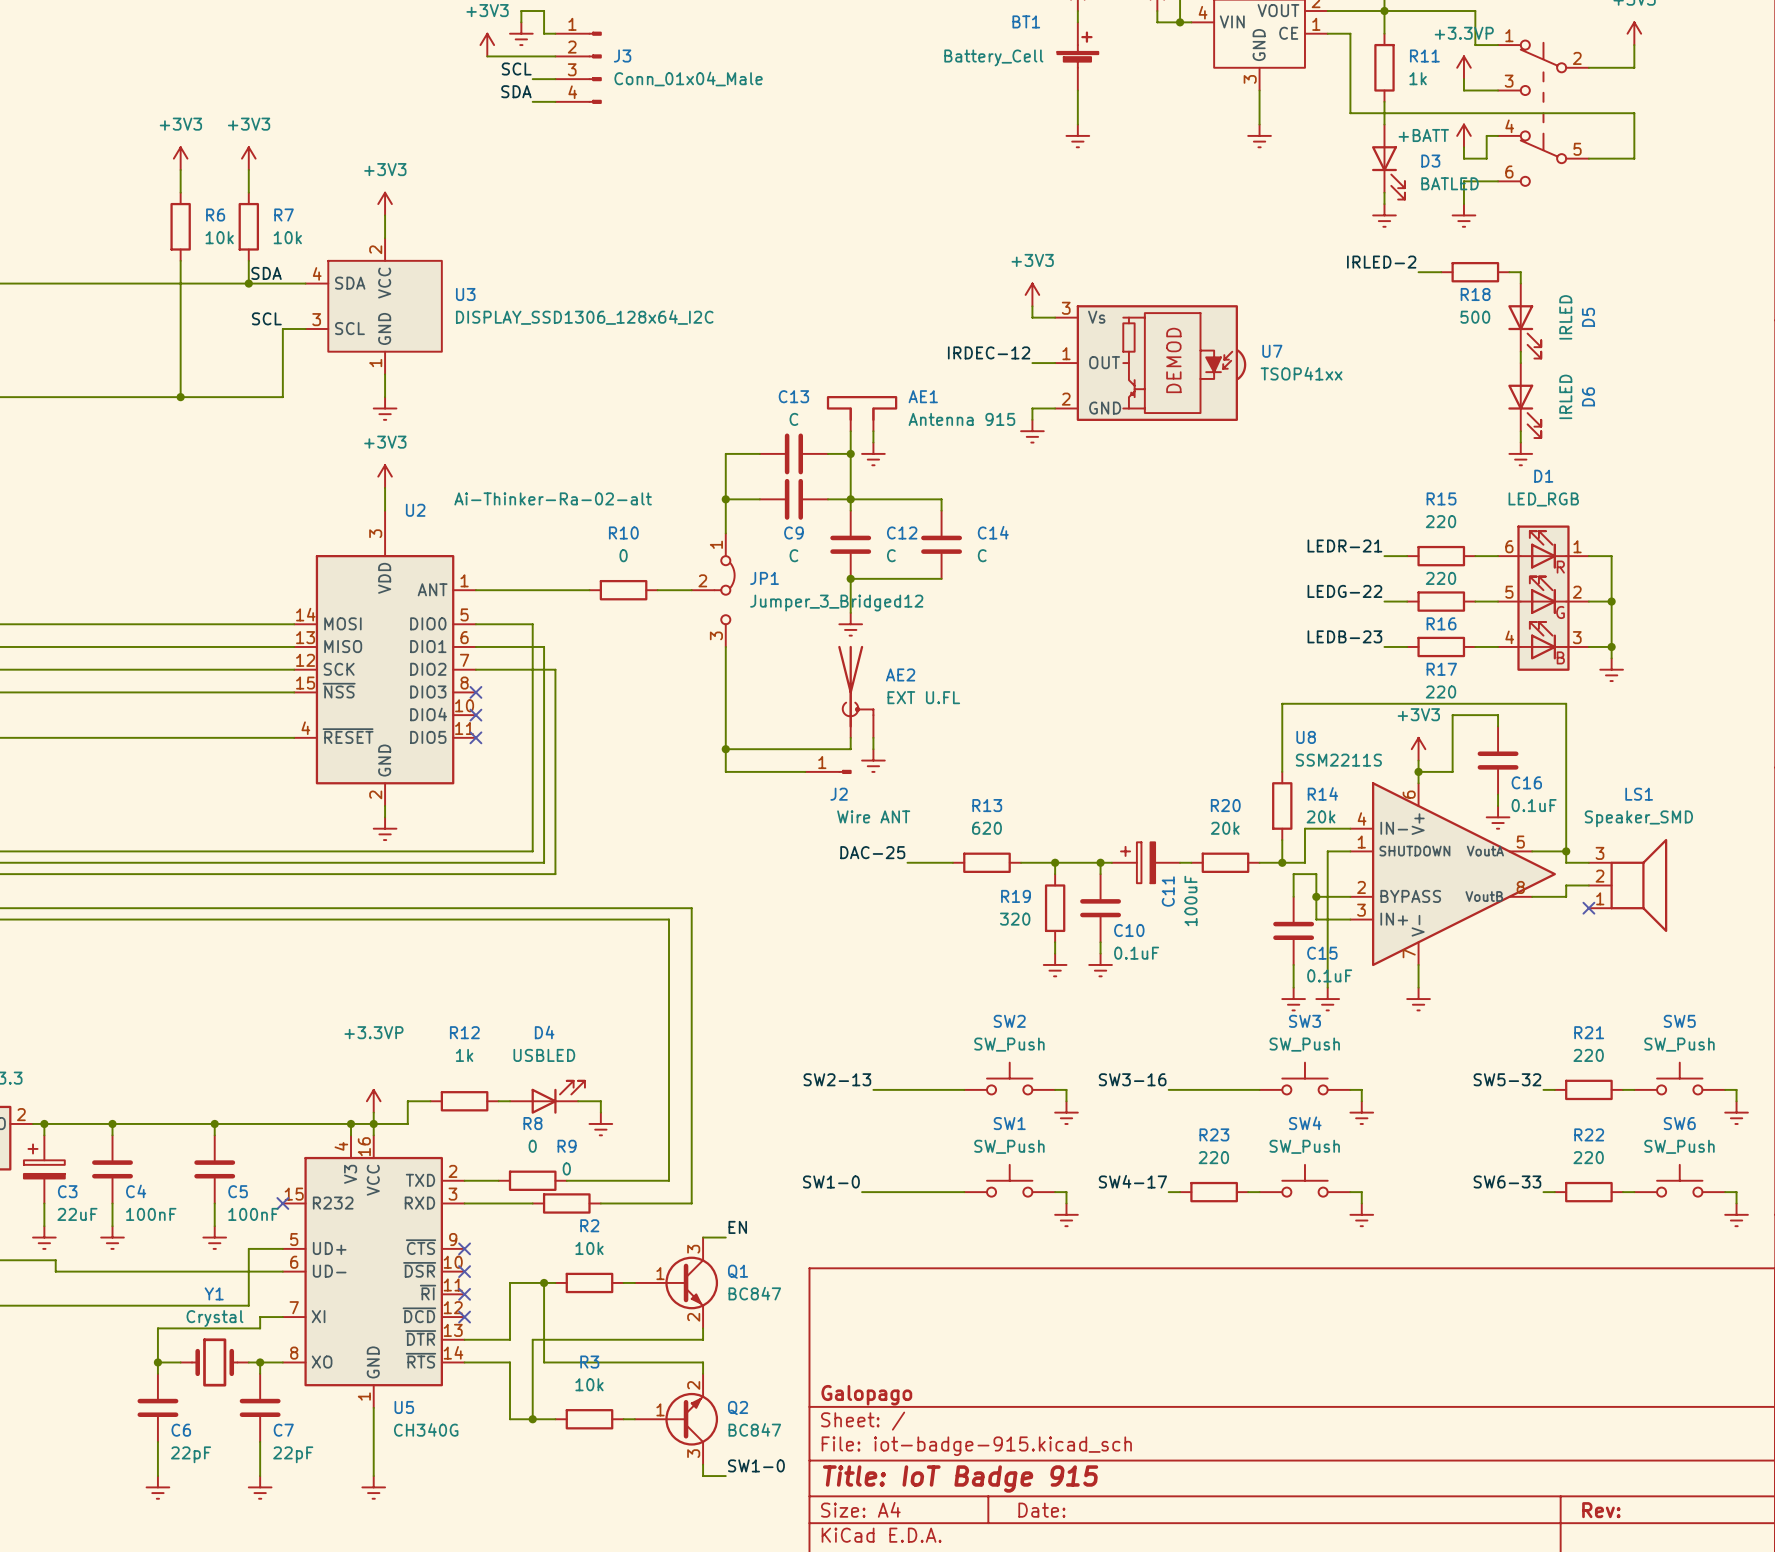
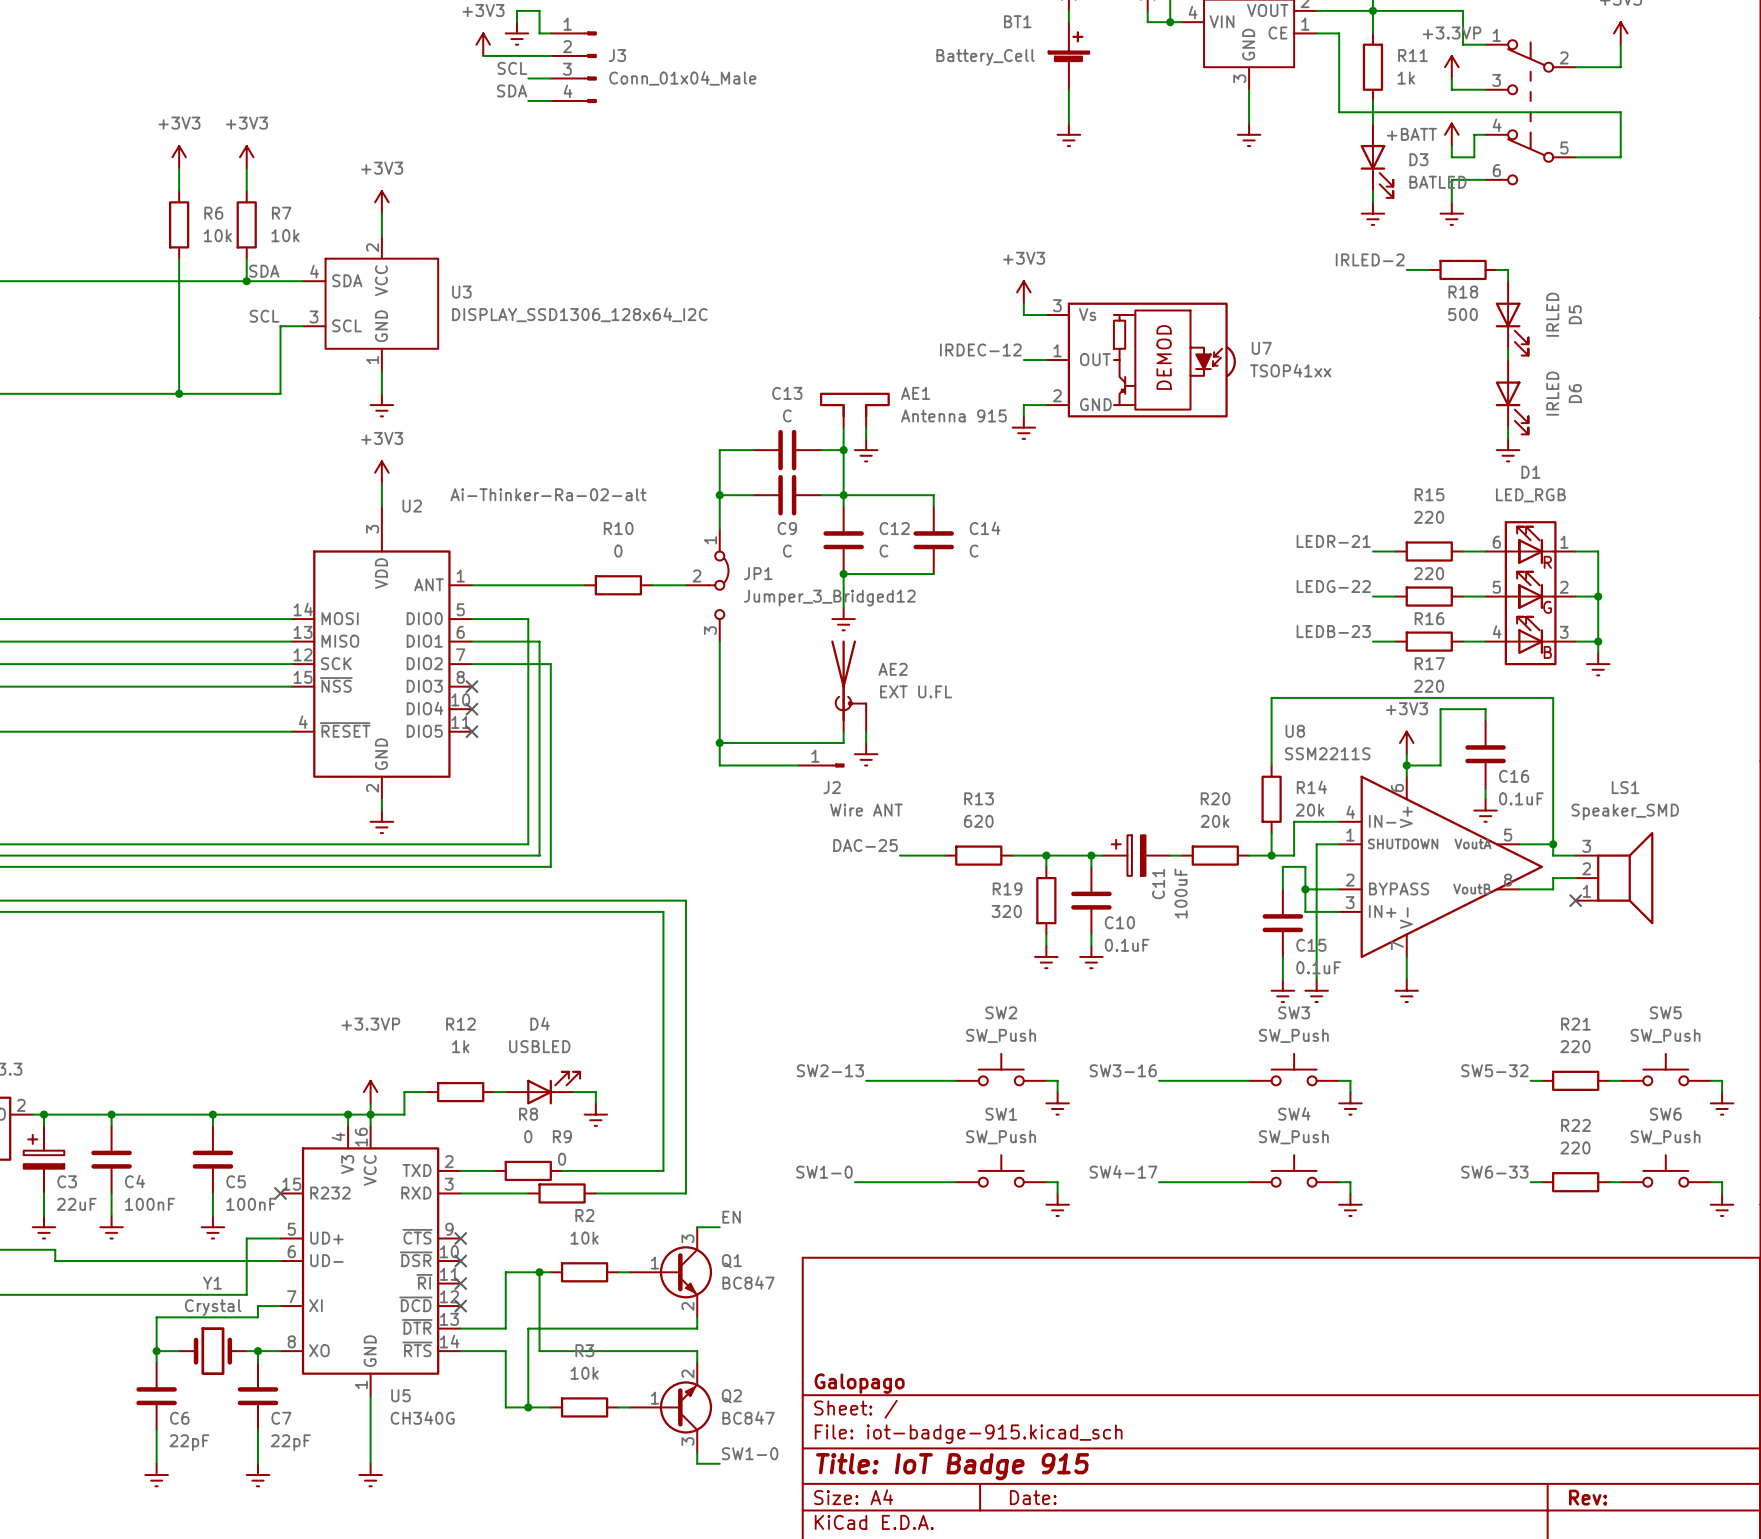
wire: none -> (1170, 1182) (1237, 1182)
R23: 220 (1214, 1192) -> none

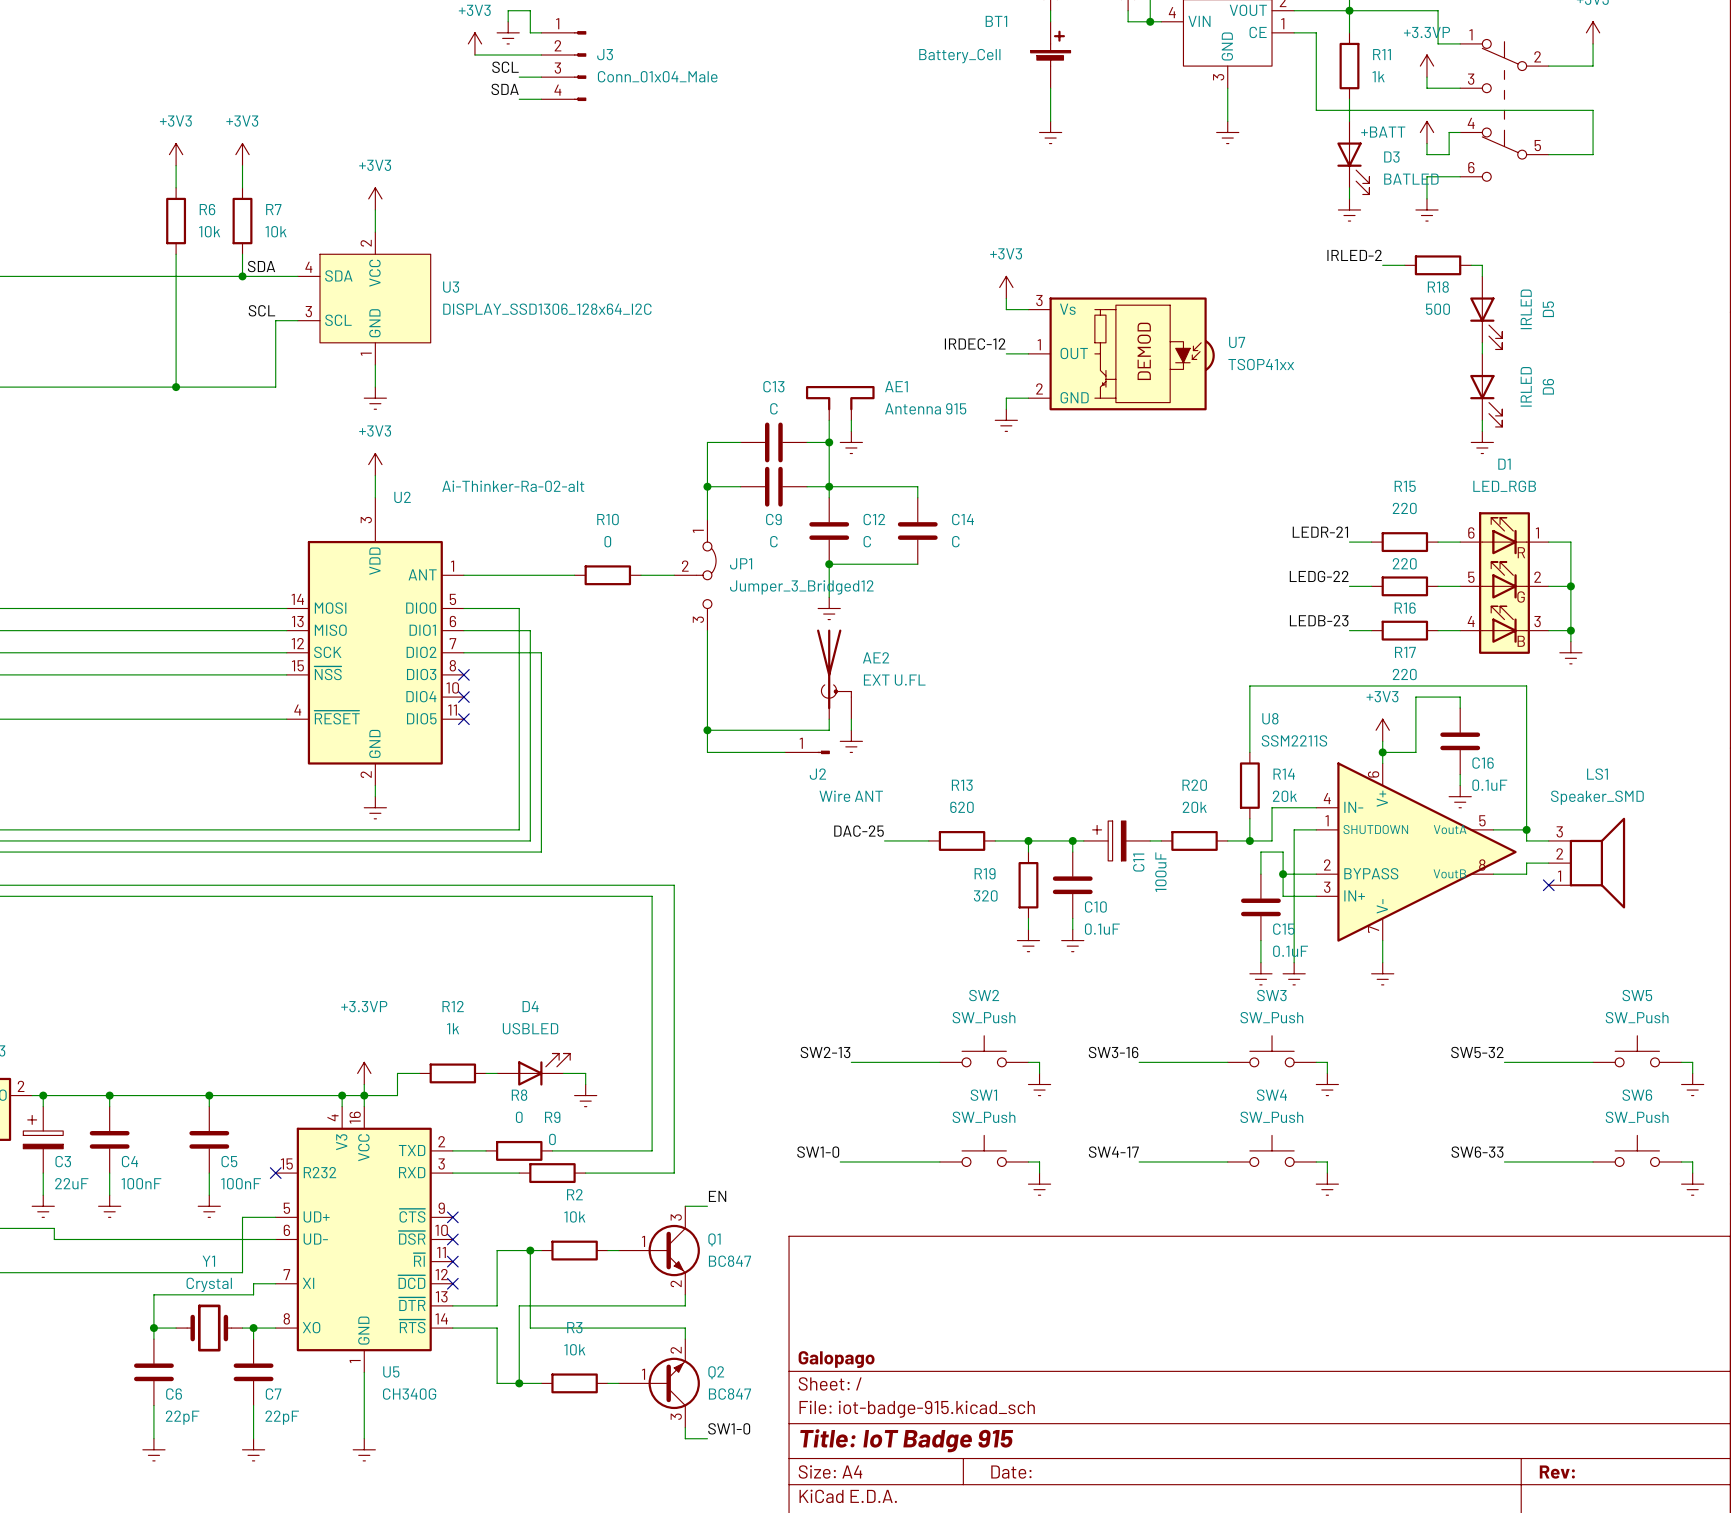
wire: none -> (1515, 1062) (1581, 1062)
R21: 220 (1575, 1080) -> none
wire: none -> (1515, 1161) (1581, 1161)
R22: 220 (1575, 1182) -> none

